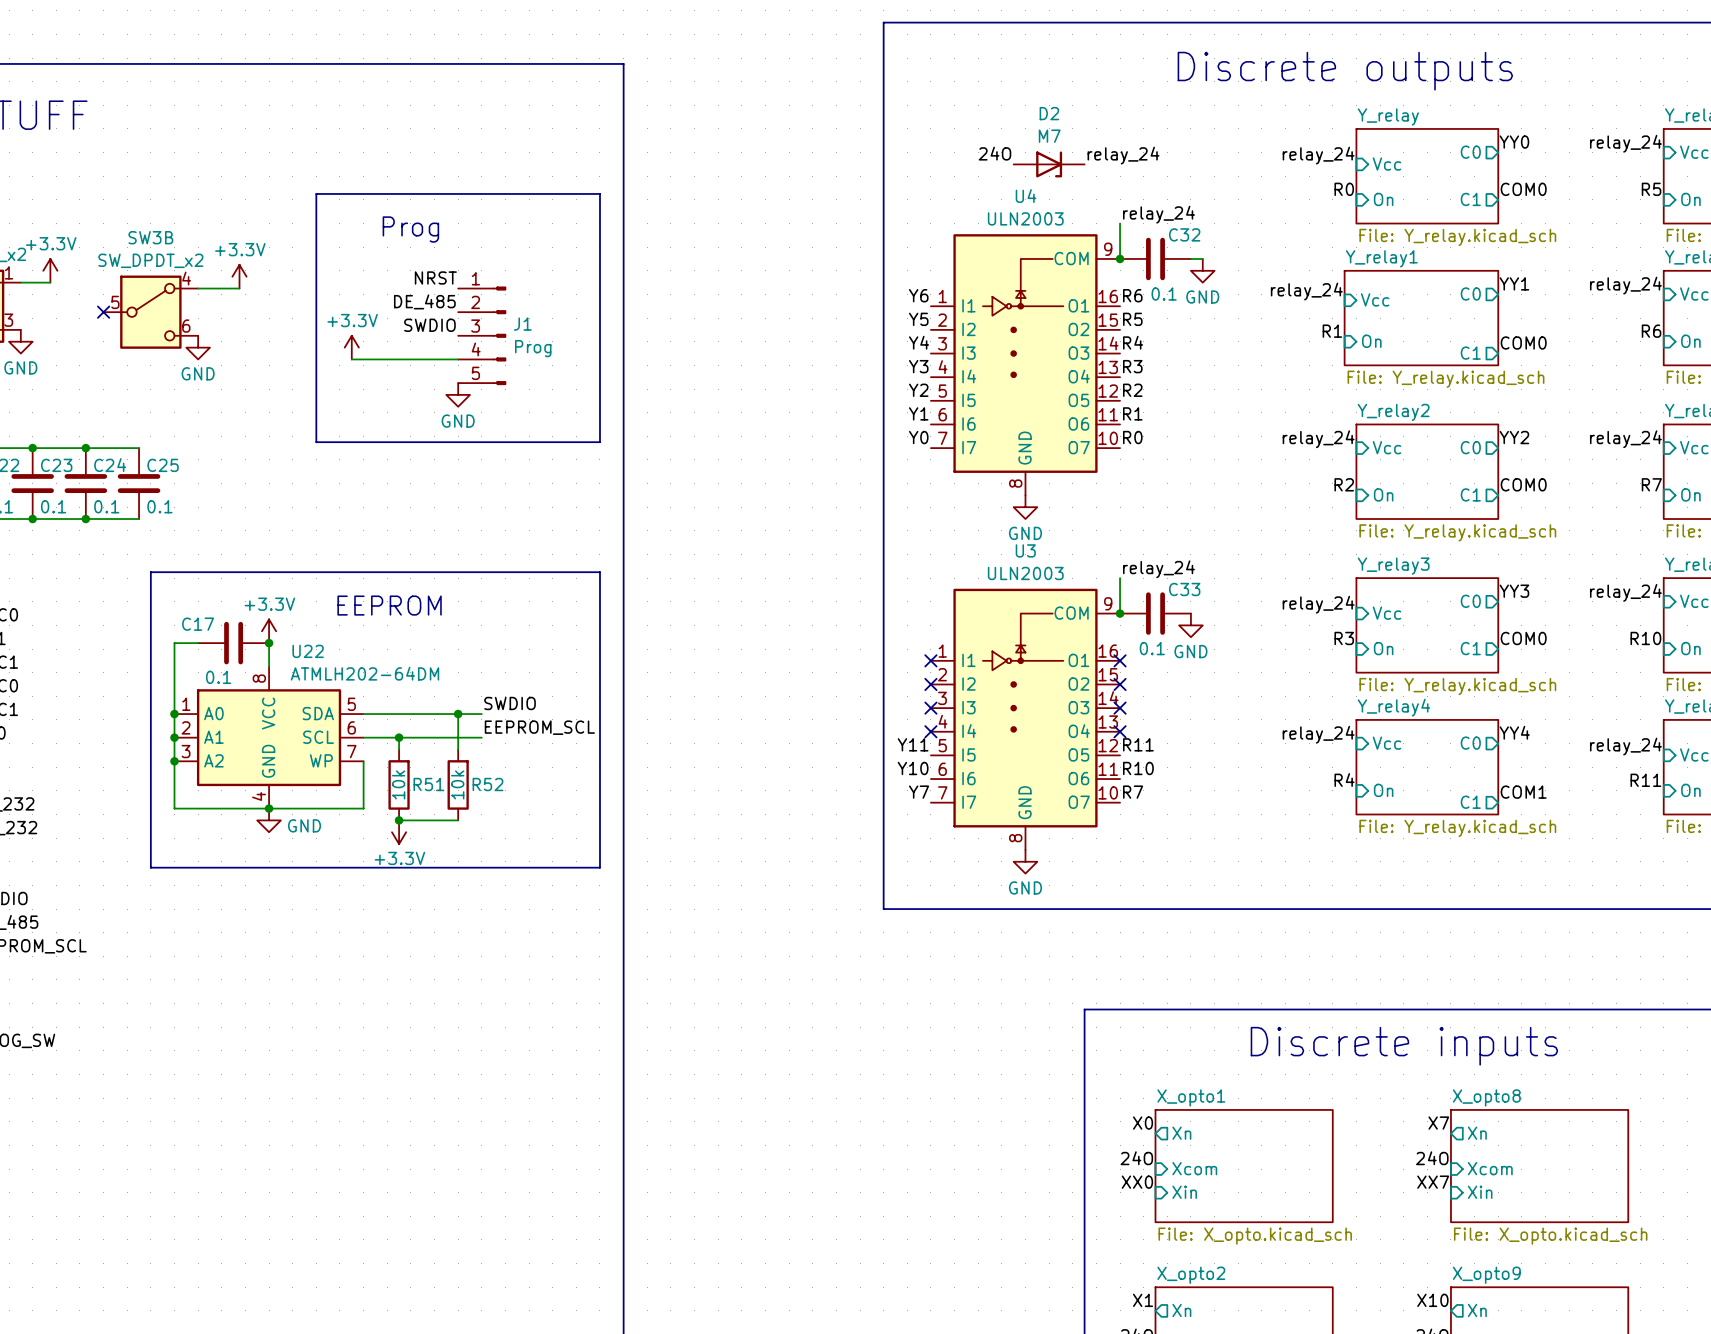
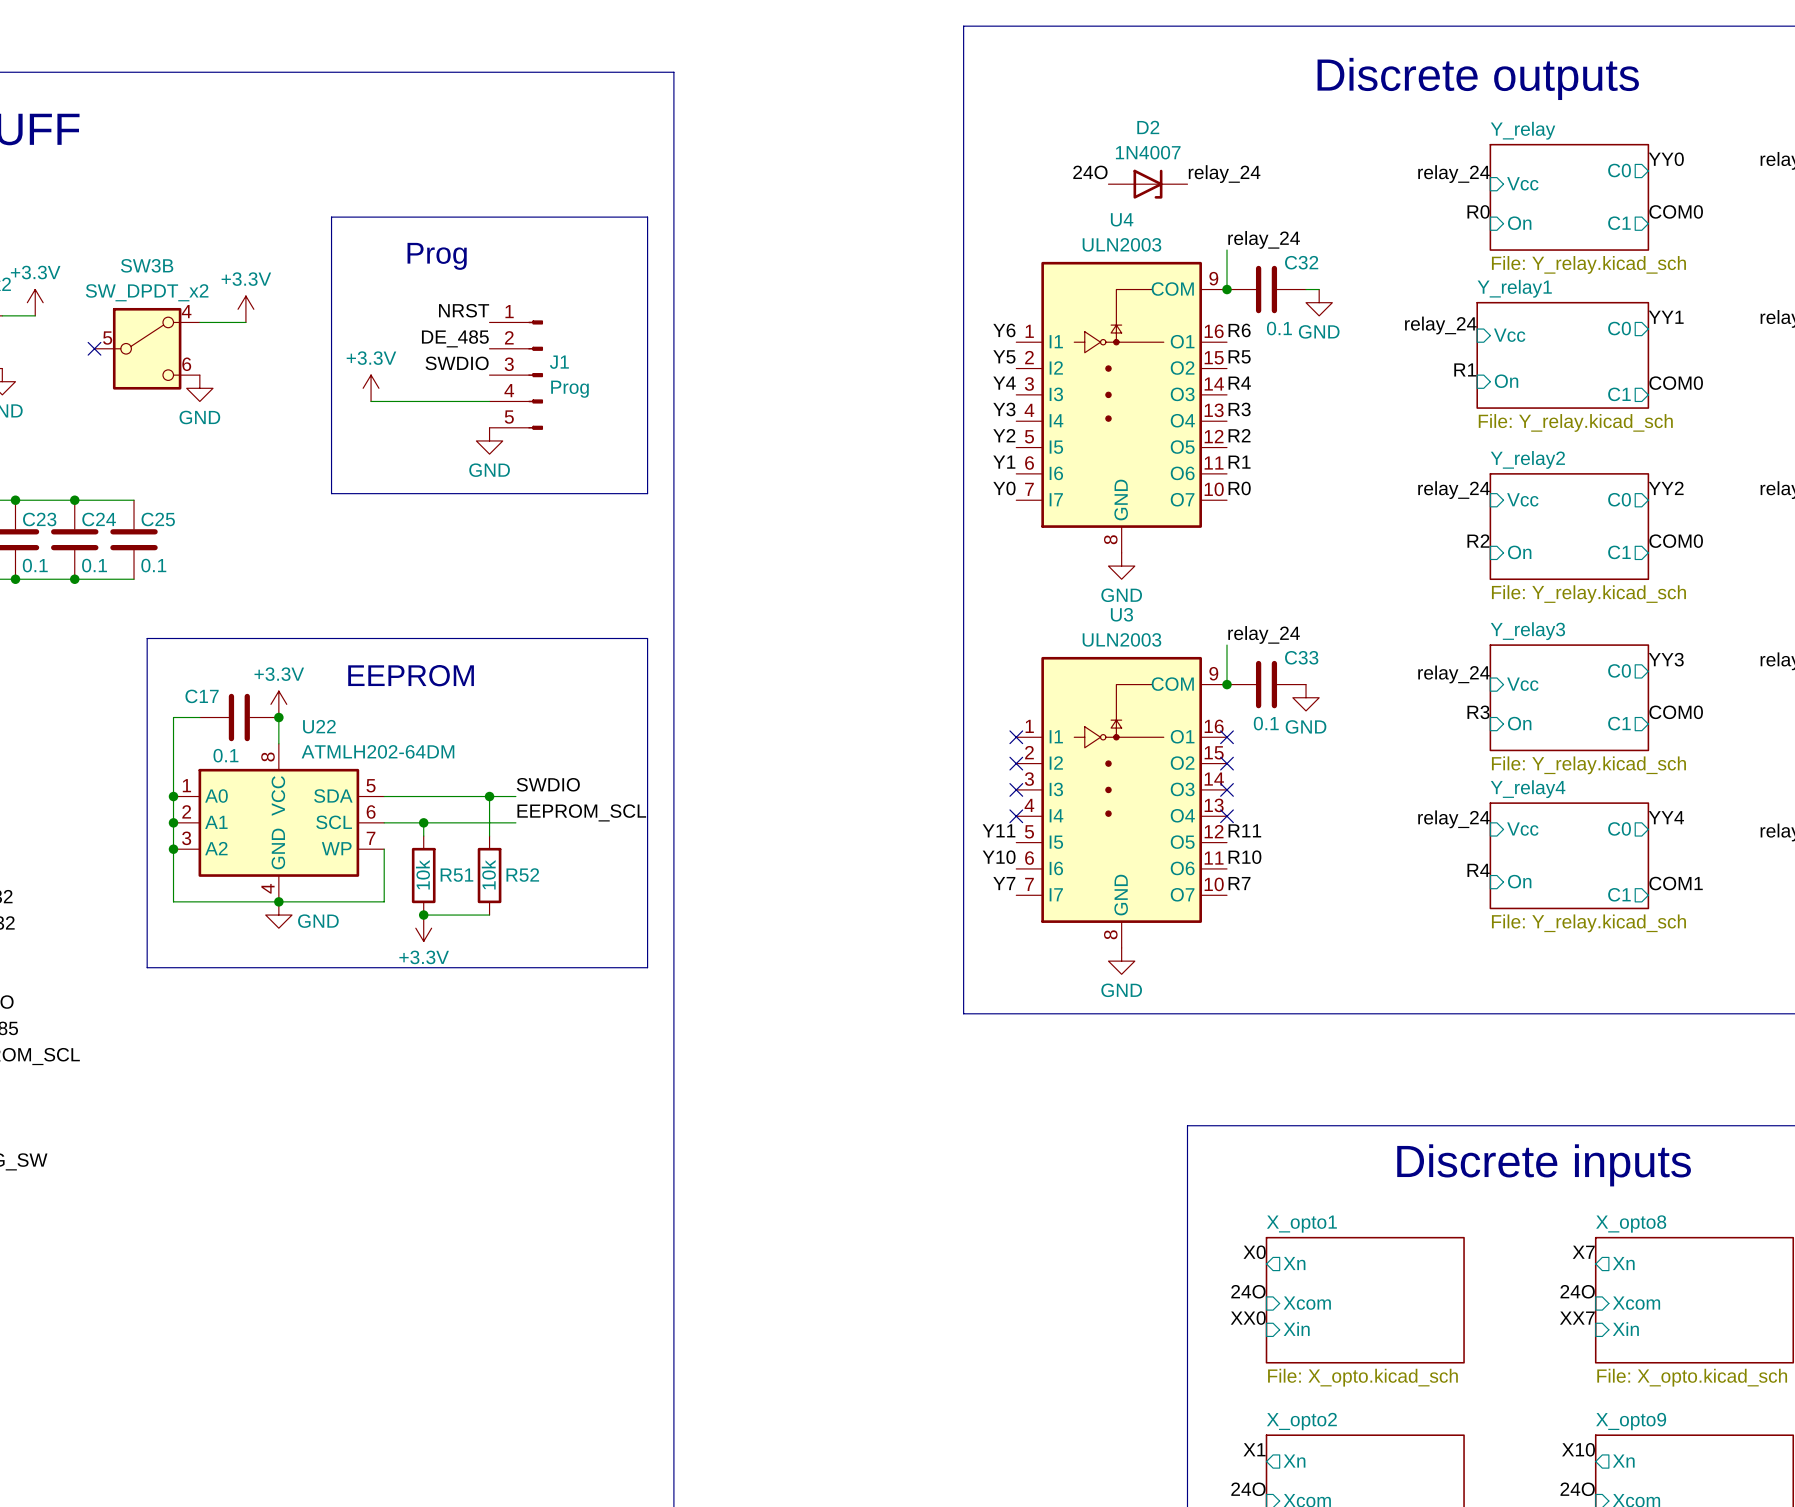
D2 value: M7 (1049, 136) -> 1N4007 (1148, 152)

